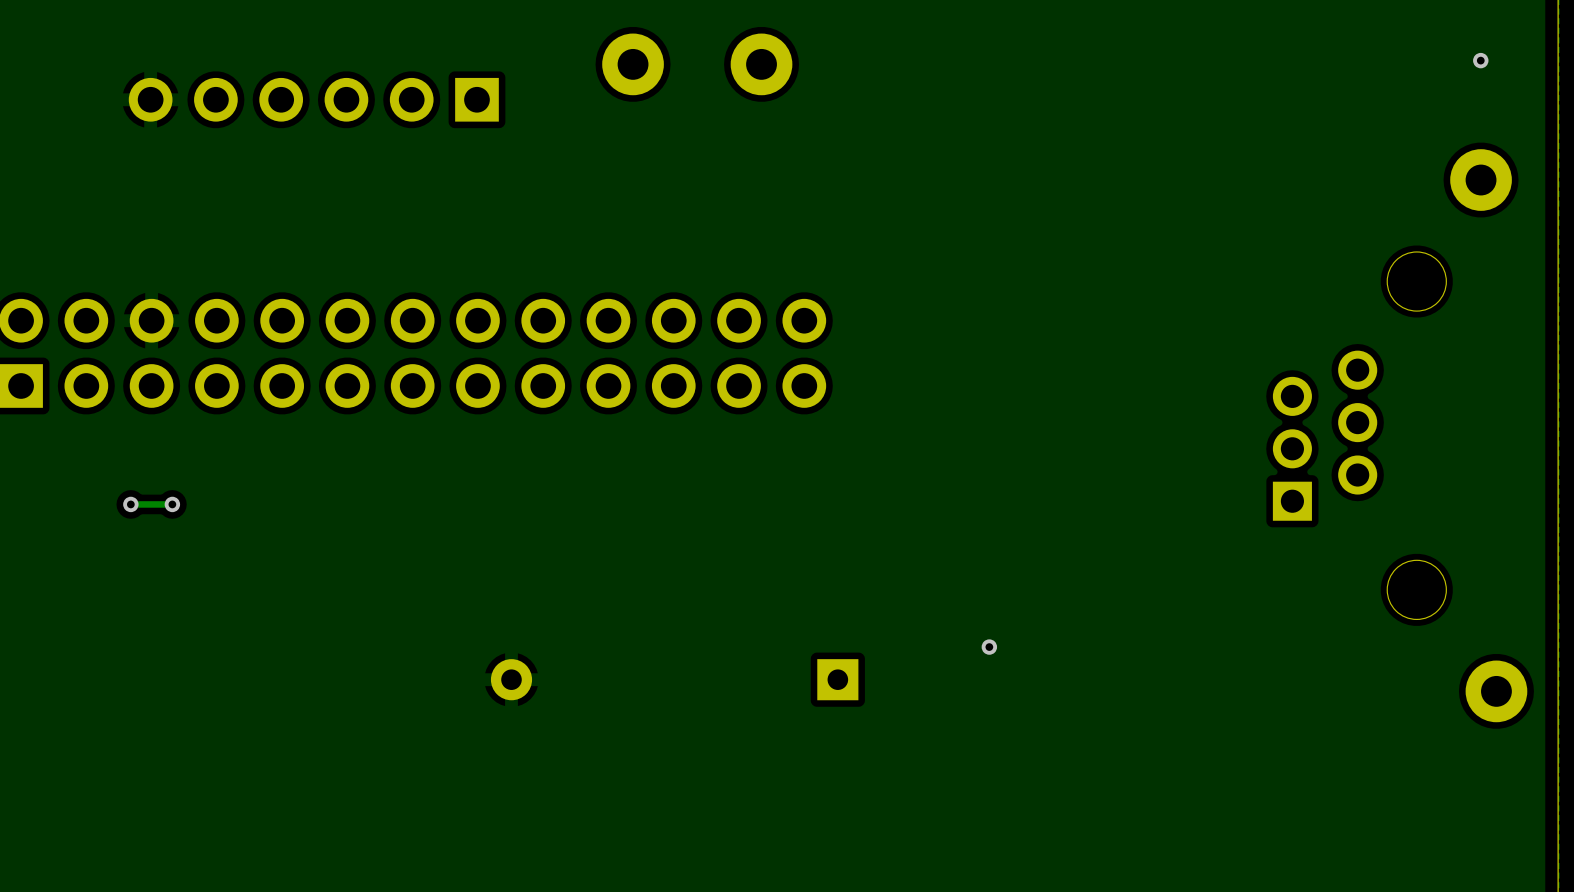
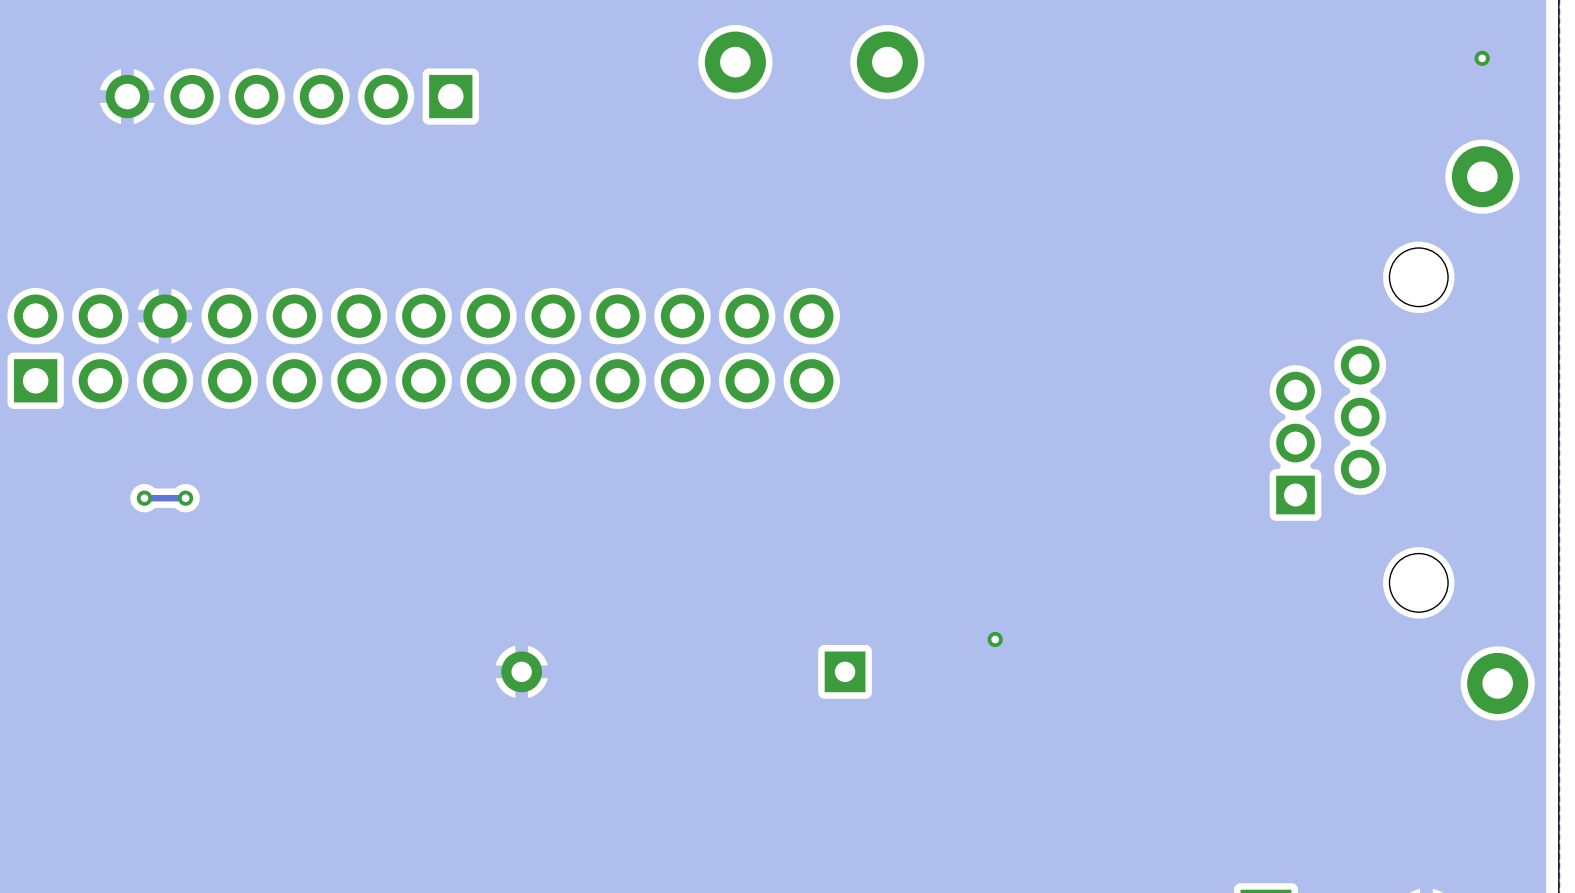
part: (633, 64) -> none
part position: (761, 64) -> (735, 62)
part: none -> (887, 62)
part position: (313, 99) -> (289, 96)

